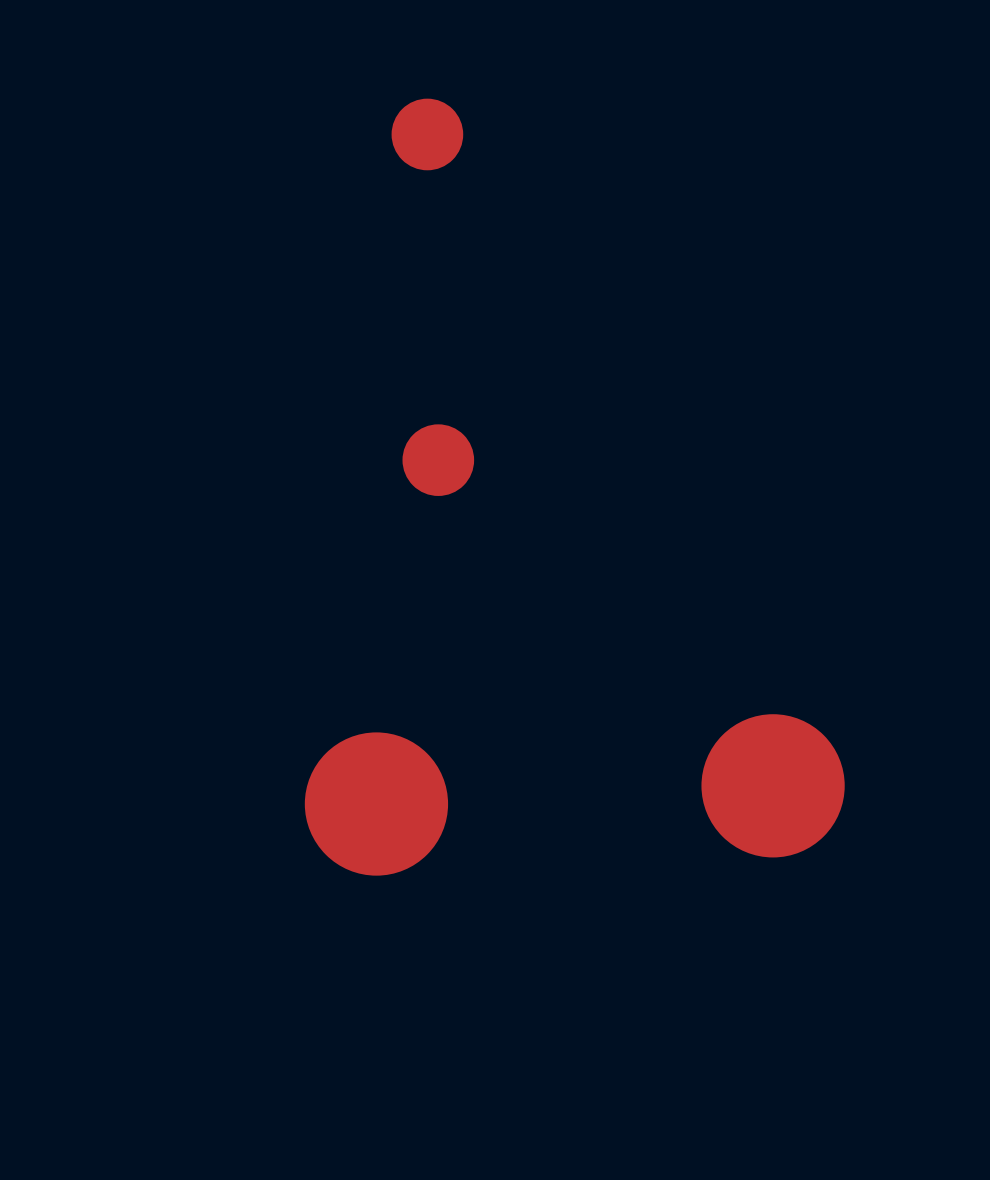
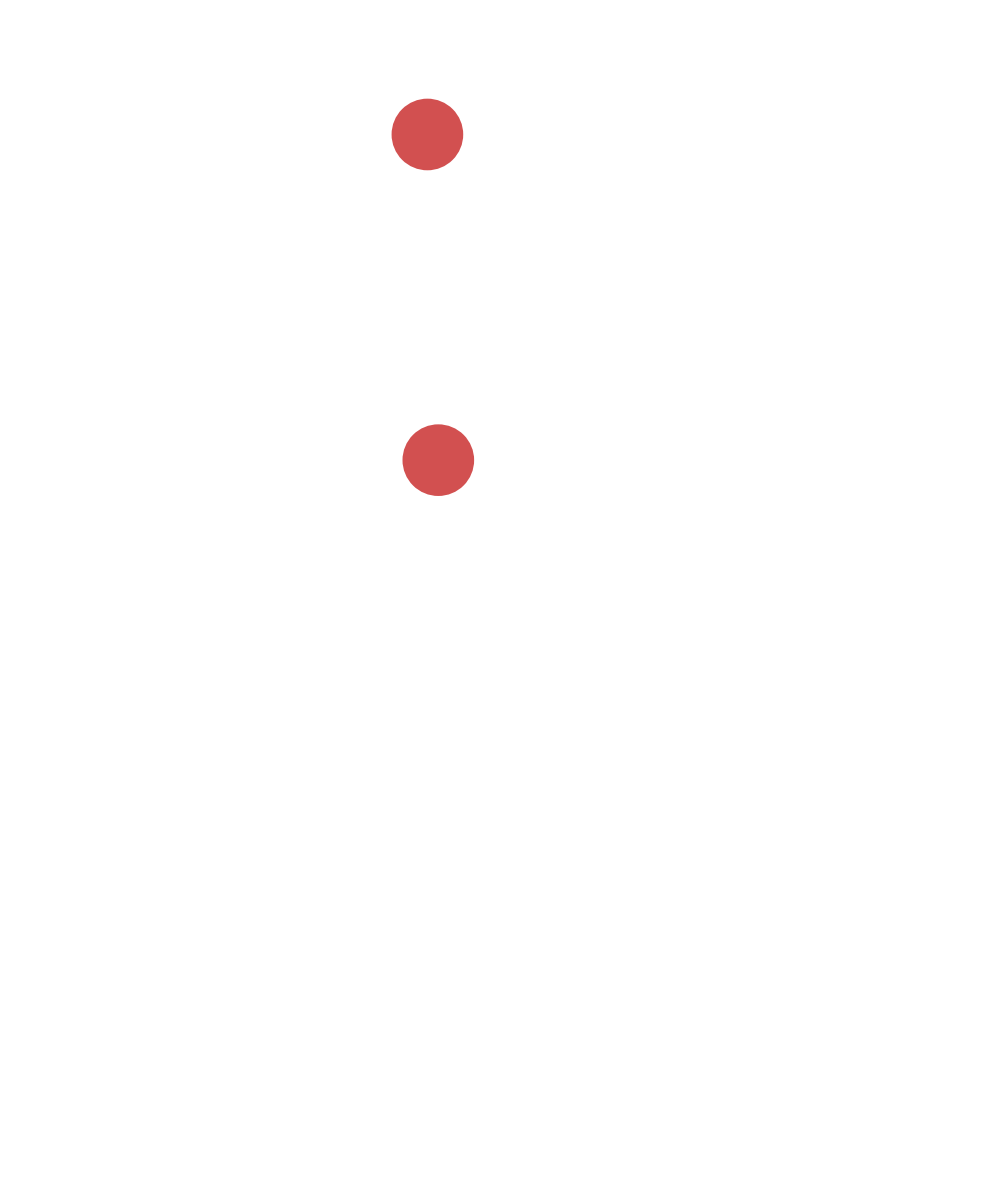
part: (773, 785) -> none
part: (376, 804) -> none

